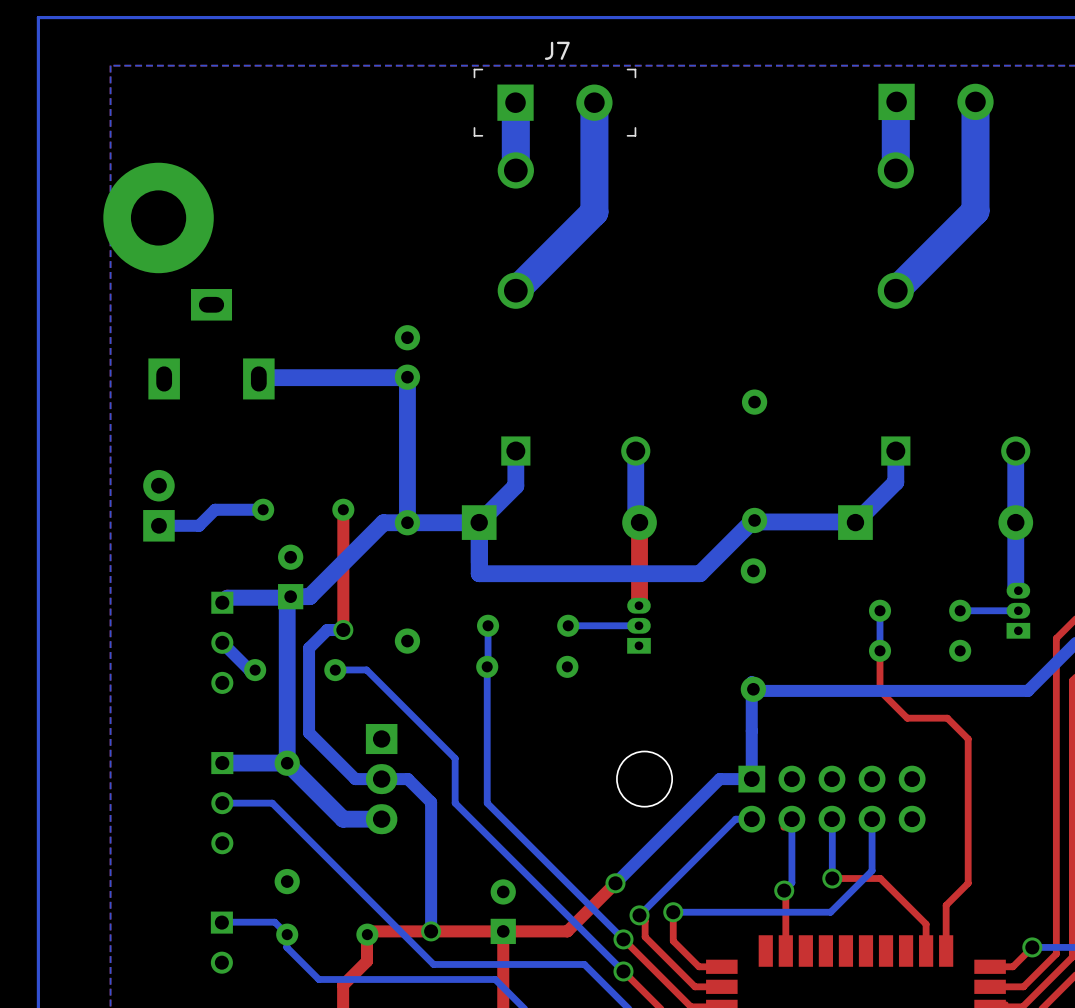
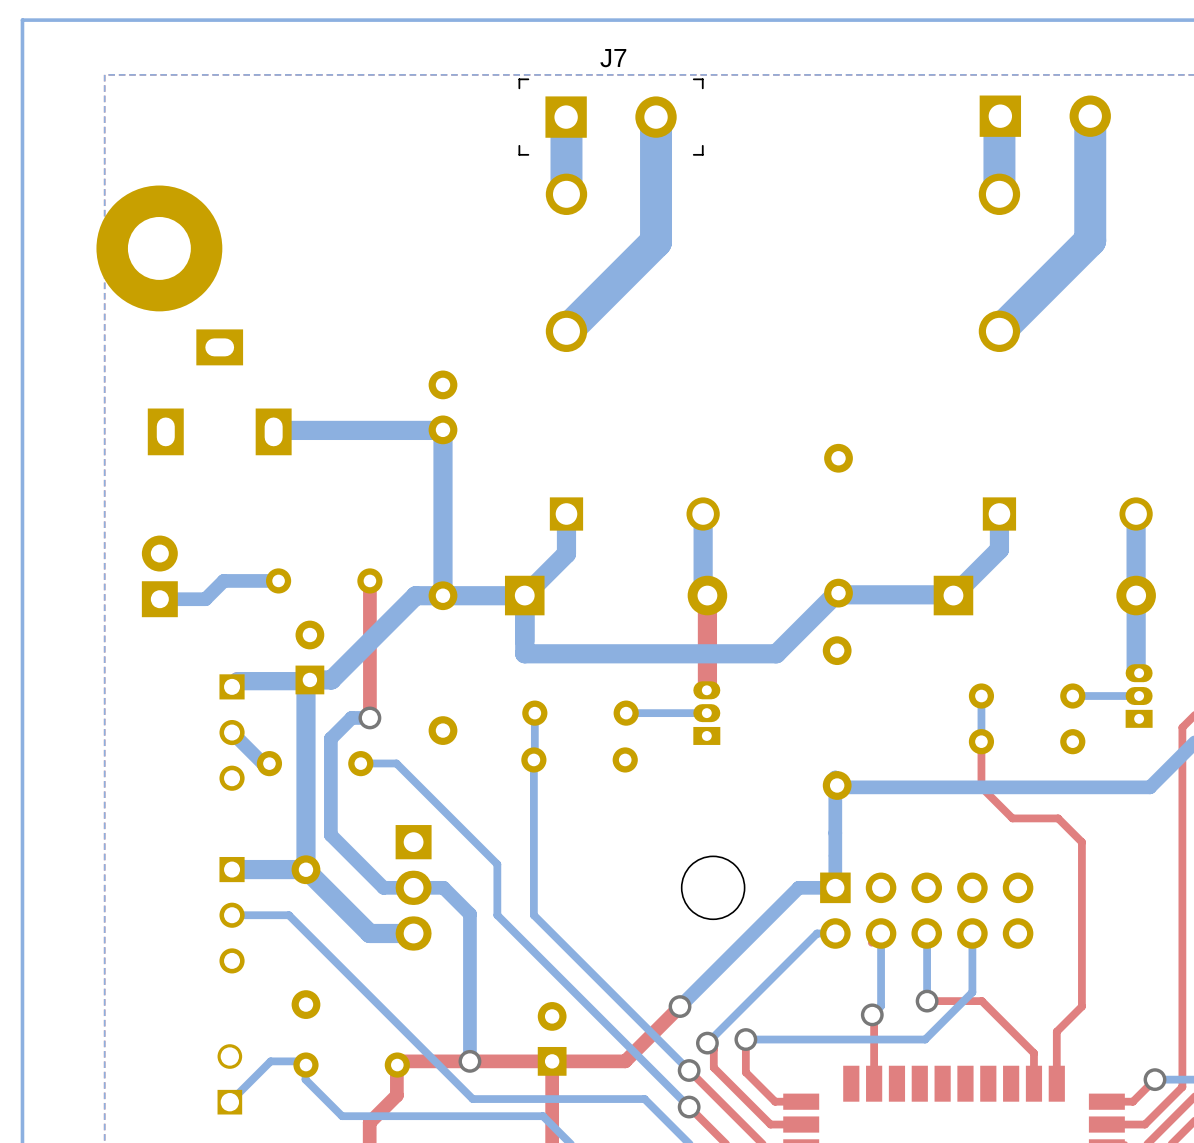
part footprint: [210, 911, 233, 974] -> [217, 1044, 243, 1115]
bottom track: (221, 922) (274, 922) (287, 934) -> none
bottom track: none -> (305, 1061) (270, 1061) (229, 1102)

